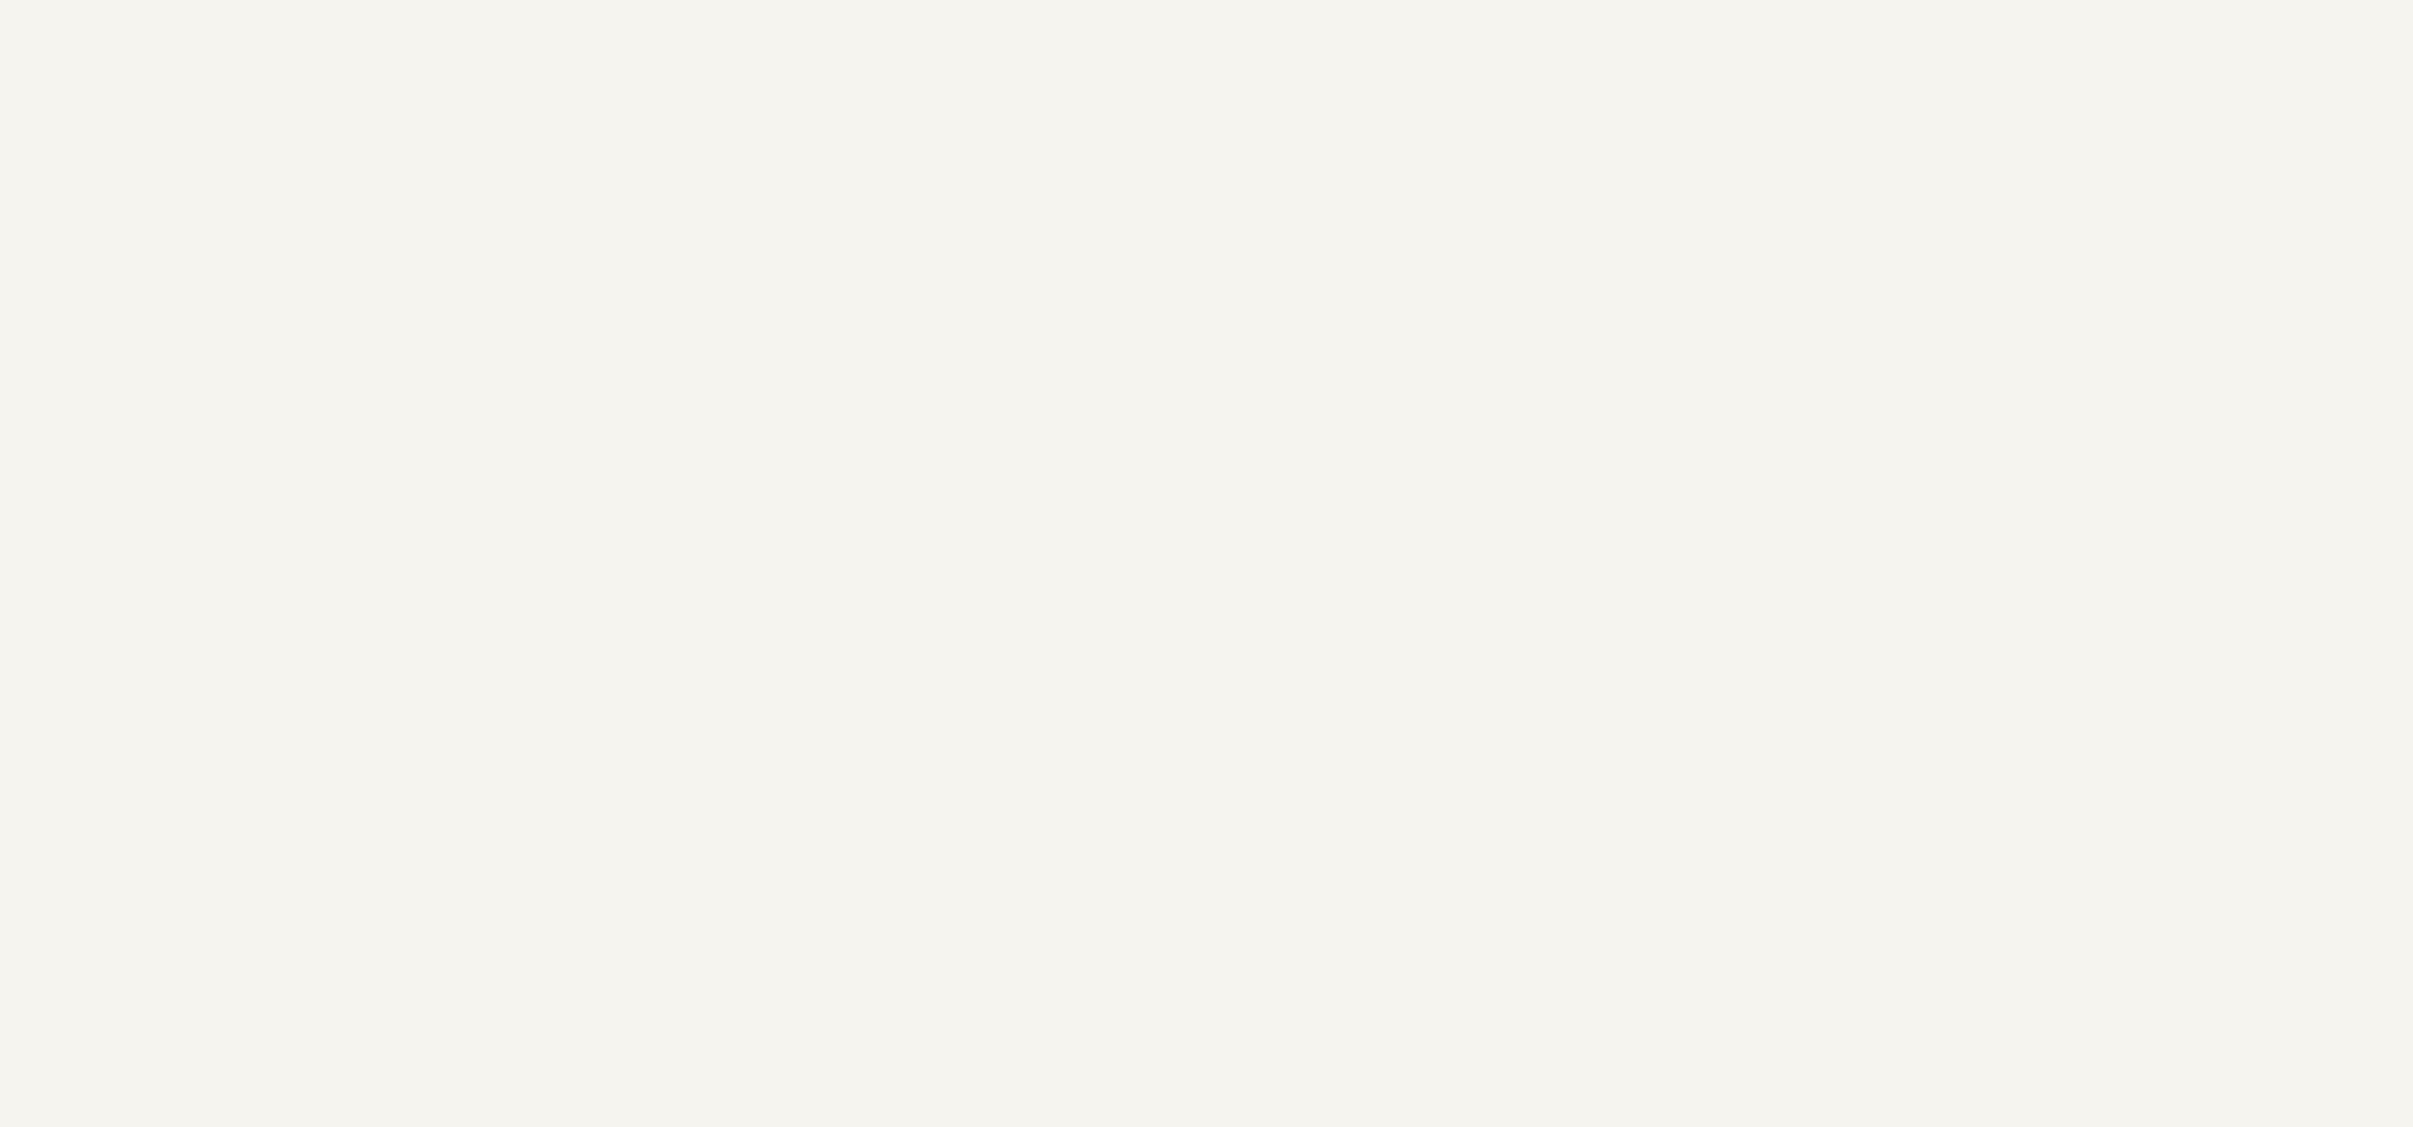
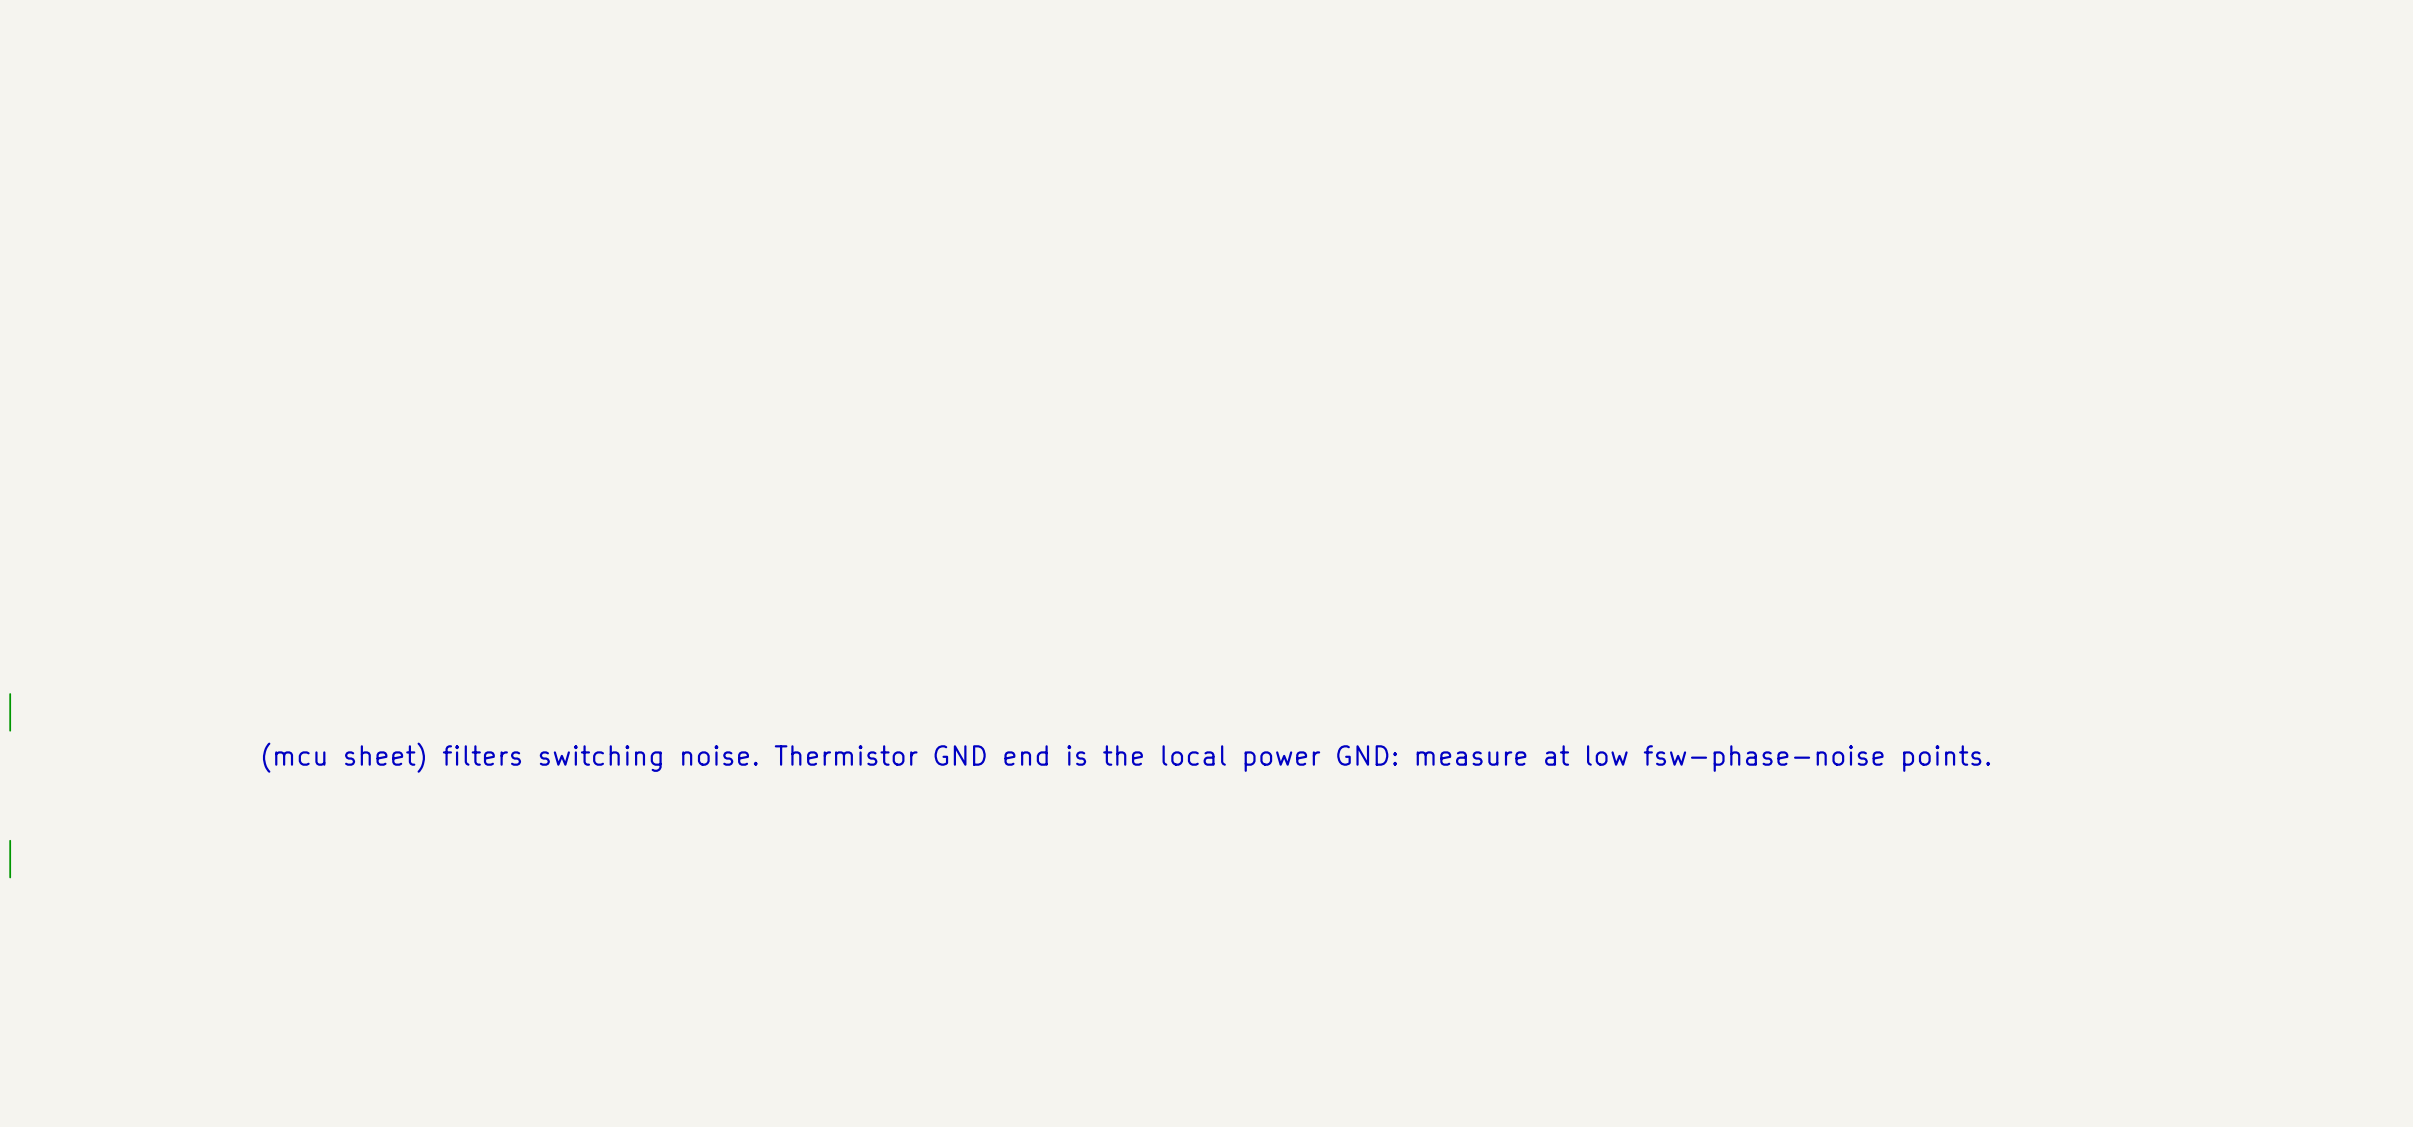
wire: none -> (10, 694) (10, 730)
text: none -> (mcu sheet) filters switching noise. Thermistor GND end is the local power GND: measure at low fsw-phase-noise points. (1126, 757)
wire: none -> (10, 840) (10, 877)

